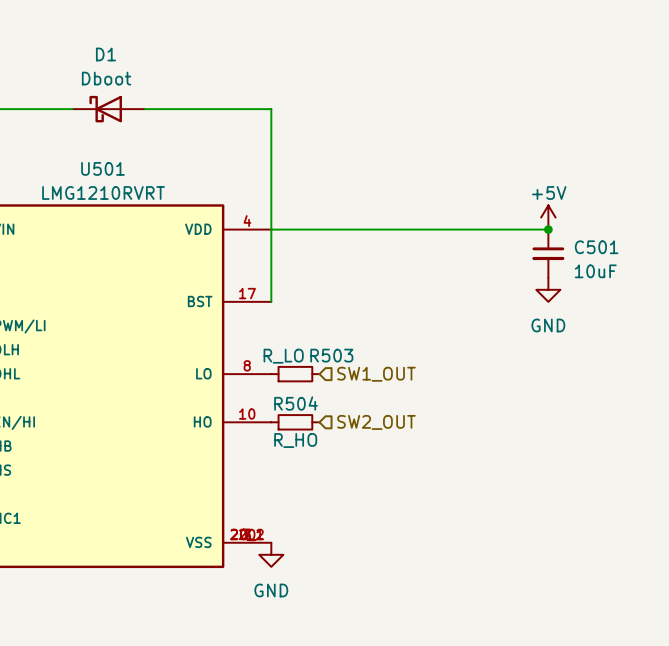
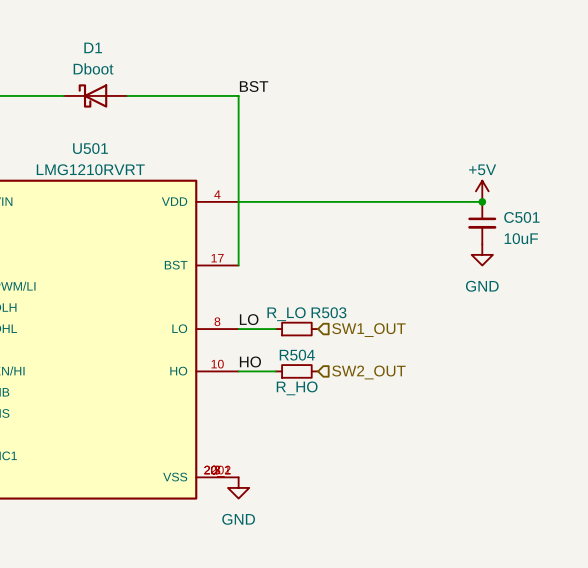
label: none -> BST (254, 86)
label: none -> LO (249, 319)
wire: none -> (238, 329) (275, 329)
R503 position: (295, 374) -> (296, 329)
hierarchical label position: SW1_OUT (376, 374) -> SW1_OUT (368, 330)
label: none -> HO (250, 361)
wire: none -> (238, 371) (275, 371)
R504 position: (295, 422) -> (296, 371)
hierarchical label position: SW2_OUT (376, 422) -> SW2_OUT (368, 372)

